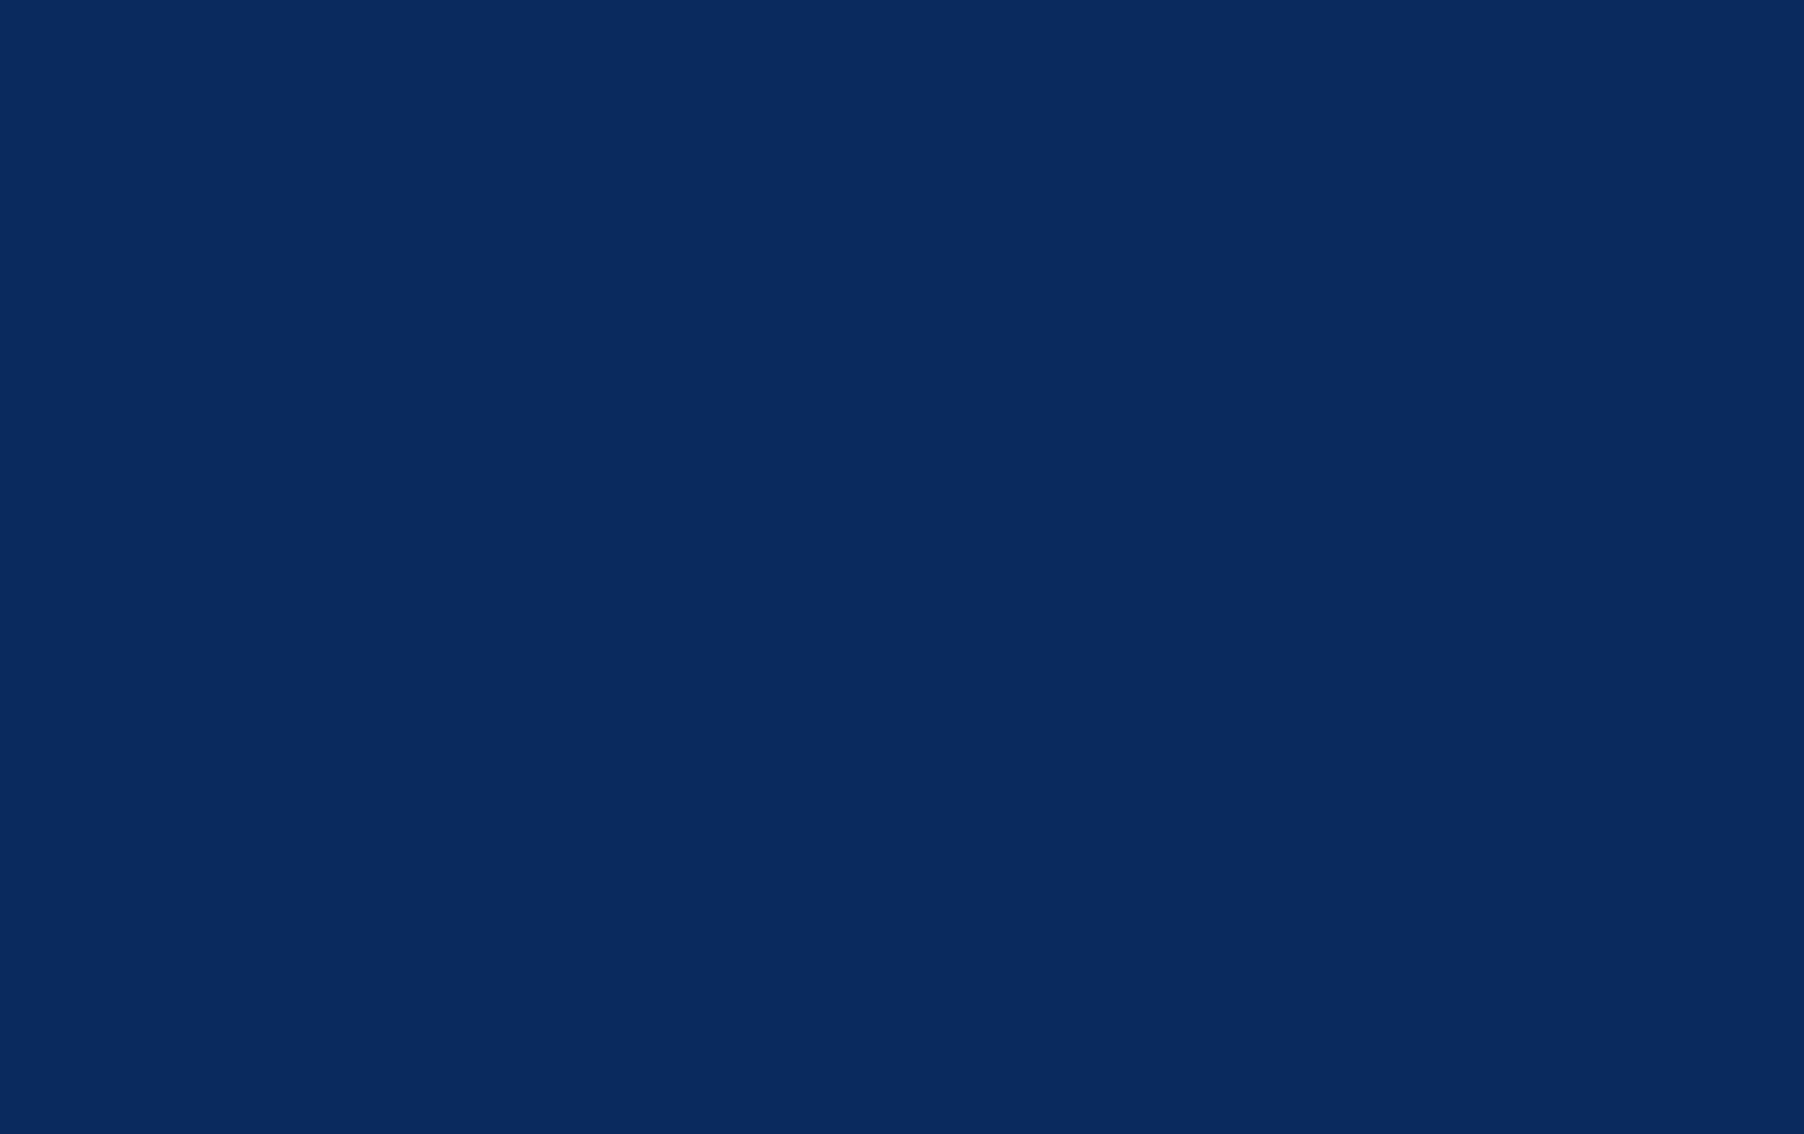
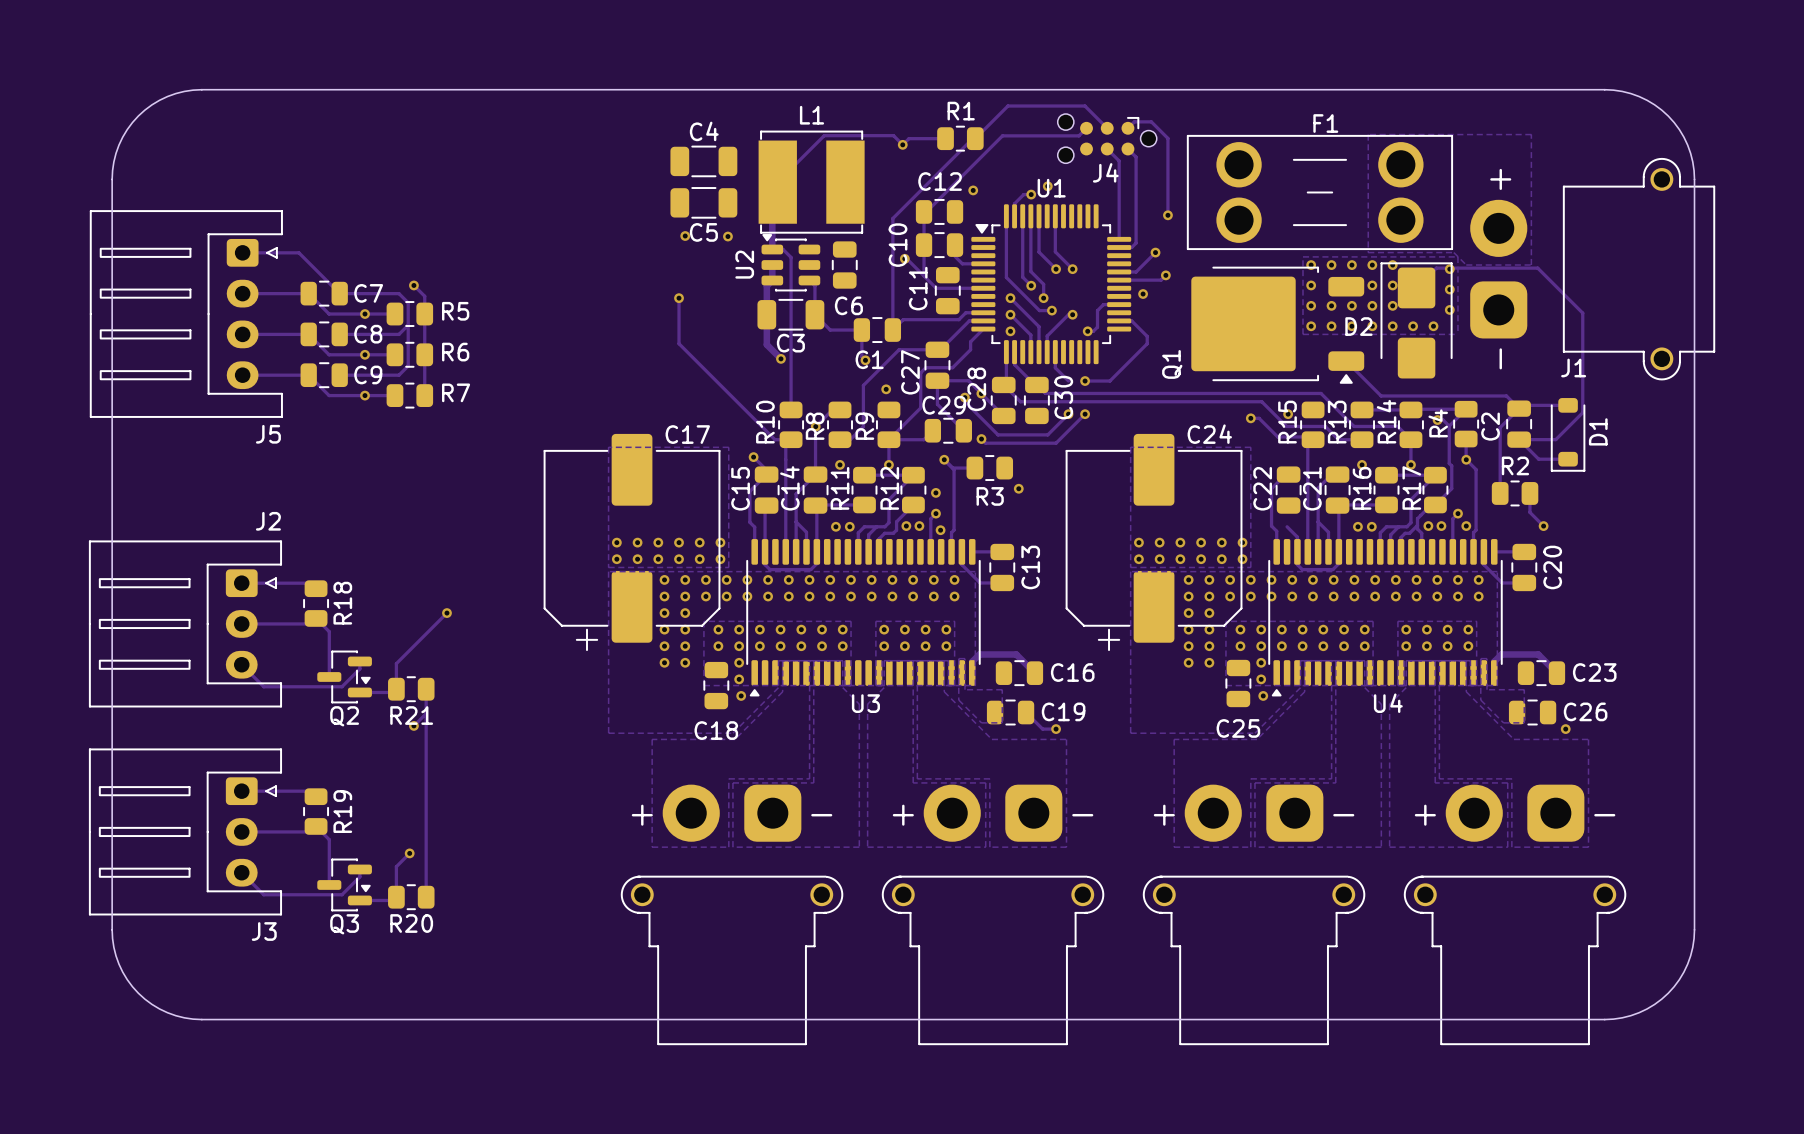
board edge: none -> (201, 89) (1604, 89) (1622, 91) (1647, 100) (1668, 115) (1683, 137) (1692, 161) (1694, 179) (1694, 929) (1692, 947) (1683, 972) (1668, 993) (1647, 1008) (1622, 1017) (1604, 1019) (201, 1019) (184, 1017) (159, 1008) (138, 993) (127, 979) (116, 955) (112, 938) (112, 179) (113, 161) (118, 145) (127, 129) (138, 115) (152, 104) (167, 96) (184, 91) (201, 89)
track: none -> (1086, 128) (1078, 135) (1002, 135) (926, 211) (924, 211) (924, 276)
track: none -> (1107, 128) (1084, 106) (1007, 106) (892, 218) (892, 330) (903, 319) (958, 319) (965, 312) (983, 312)
track: none -> (1127, 128) (1134, 121) (1151, 121) (1167, 138) (1167, 215)
zone outline: none -> (1368, 134) (1368, 252) (1453, 252) (1466, 265) (1531, 265) (1531, 134) (1368, 134)
track: none -> (945, 138) (908, 138) (902, 144) (893, 135) (824, 135) (777, 182)
R1: none -> (960, 138)
J4: none -> (1107, 138)
via: none -> (902, 144)
track: none -> (1107, 149) (1119, 160) (1119, 239)
track: none -> (1127, 149) (1136, 157) (1136, 243) (1131, 247) (1119, 247)
C4: none -> (703, 161)
L1: none -> (811, 182)
via: none -> (1047, 186)
track: none -> (772, 187) (772, 249) (783, 249) (791, 257) (791, 409)
via: none -> (973, 190)
F1: none -> (1319, 192)
track: none -> (1031, 194) (1023, 194) (1014, 203) (1014, 216)
via: none -> (1031, 194)
C5: none -> (703, 202)
C12: none -> (939, 211)
via: none -> (1167, 215)
track: none -> (1006, 216) (1006, 277) (1039, 310) (1051, 310)
track: none -> (1022, 216) (1022, 277) (1031, 285)
track: none -> (1030, 216) (1030, 271) (1043, 284) (1043, 298)
track: none -> (1039, 216) (1039, 252) (1056, 269)
track: none -> (1055, 216) (1055, 251) (1072, 269)
via: none -> (685, 236)
via: none -> (727, 236)
C10: none -> (939, 245)
track: none -> (242, 252) (298, 252) (339, 293) (399, 293) (408, 302) (408, 365) (399, 375) (339, 375)
track: none -> (1155, 252) (1136, 271) (1119, 271)
via: none -> (1155, 252)
track: none -> (955, 256) (962, 263) (983, 263)
zone outline: none -> (1302, 256) (1302, 334) (1457, 334) (1457, 256) (1302, 256)
track: none -> (904, 258) (936, 288) (983, 288)
via: none -> (904, 258)
U2: none -> (790, 262)
track: none -> (772, 265) (772, 280) (766, 286) (766, 344) (780, 358)
C6: none -> (844, 265)
via: none -> (1311, 265)
via: none -> (1331, 265)
via: none -> (1351, 265)
via: none -> (1372, 265)
via: none -> (1392, 265)
via: none -> (1056, 269)
via: none -> (1072, 269)
via: none -> (1449, 269)
J1: none -> (1592, 269)
track: none -> (1165, 275) (1161, 280) (1119, 280)
via: none -> (1165, 275)
track: none -> (809, 280) (814, 286) (814, 314) (830, 330) (861, 330) (861, 356) (865, 360)
U1: none -> (1051, 284)
track: none -> (413, 285) (424, 296) (424, 395)
via: none -> (413, 285)
via: none -> (1031, 285)
via: none -> (1311, 285)
via: none -> (1372, 285)
via: none -> (1392, 285)
track: none -> (1416, 287) (1436, 268) (1537, 268) (1582, 313) (1582, 412) (1555, 439) (1519, 439) (1538, 459) (1568, 459)
via: none -> (1449, 289)
C11: none -> (947, 290)
track: none -> (242, 293) (308, 293) (329, 314) (394, 314)
C7: none -> (324, 293)
via: none -> (1143, 294)
track: none -> (679, 298) (679, 343) (774, 439) (791, 439) (785, 445) (785, 551)
via: none -> (679, 298)
track: none -> (1010, 298) (1039, 326) (1039, 352)
via: none -> (1010, 298)
via: none -> (1043, 298)
track: none -> (1119, 304) (1103, 304) (1097, 310) (1097, 327) (1093, 331) (1087, 331)
via: none -> (1311, 305)
via: none -> (1331, 305)
via: none -> (1351, 305)
via: none -> (1372, 305)
via: none -> (1392, 305)
via: none -> (1449, 309)
via: none -> (1051, 310)
J5: none -> (186, 314)
via: none -> (364, 314)
R5: none -> (409, 314)
C3: none -> (790, 314)
track: none -> (1010, 314) (1030, 335) (1030, 352)
via: none -> (1010, 314)
track: none -> (1072, 314) (1068, 314) (1047, 336) (1047, 352)
via: none -> (1072, 314)
track: none -> (983, 320) (969, 320) (940, 349) (899, 349) (863, 385) (863, 426) (850, 439) (840, 439)
track: none -> (1119, 320) (1131, 320) (1147, 336) (1147, 343) (1109, 381) (1085, 381)
D2: none -> (1416, 320)
track: none -> (408, 325) (399, 334) (339, 334)
Q1: none -> (1277, 325)
via: none -> (1311, 326)
via: none -> (1331, 326)
via: none -> (1351, 326)
via: none -> (1372, 326)
via: none -> (1392, 326)
via: none -> (1413, 326)
via: none -> (1433, 326)
track: none -> (983, 329) (970, 341) (970, 349) (952, 367) (925, 367) (920, 372) (920, 407) (888, 439)
C1: none -> (877, 330)
via: none -> (1010, 331)
via: none -> (1087, 331)
track: none -> (242, 334) (308, 334) (329, 354) (394, 354)
C8: none -> (324, 334)
track: none -> (1006, 352) (1006, 382) (1003, 384) (1020, 401) (1261, 401) (1286, 426) (1325, 426) (1338, 439) (1362, 439)
track: none -> (1014, 352) (1014, 364) (1045, 393) (1321, 393) (1354, 426) (1397, 426) (1410, 439) (1410, 464)
track: none -> (1055, 352) (1055, 367) (1068, 381)
via: none -> (364, 354)
R6: none -> (409, 354)
via: none -> (780, 358)
via: none -> (865, 360)
track: none -> (1346, 361) (1381, 395) (1506, 395) (1519, 408)
C27: none -> (937, 365)
track: none -> (242, 375) (308, 375) (329, 395) (394, 395)
C9: none -> (324, 375)
via: none -> (1085, 381)
via: none -> (886, 389)
via: none -> (981, 393)
via: none -> (364, 395)
R7: none -> (409, 395)
track: none -> (964, 397) (964, 401) (998, 434) (1047, 434) (1068, 414)
via: none -> (964, 397)
C28: none -> (1003, 400)
C30: none -> (1036, 400)
track: none -> (1568, 405) (1526, 405) (1523, 408) (1519, 408)
track: none -> (1519, 408) (1500, 427) (1500, 493)
track: none -> (1362, 409) (1466, 409) (1449, 426)
track: none -> (840, 410) (832, 410) (815, 426) (815, 474) (796, 493) (796, 551)
via: none -> (1068, 414)
track: none -> (1085, 414) (1056, 443) (985, 443) (981, 439)
via: none -> (1085, 414)
via: none -> (1288, 414)
track: none -> (1004, 416) (968, 380) (937, 380) (937, 404) (963, 430)
track: none -> (1250, 418) (1259, 418) (1277, 436) (1310, 436) (1313, 439) (1307, 445) (1307, 551)
via: none -> (1250, 418)
track: none -> (1437, 420) (1443, 420) (1449, 426)
via: none -> (1437, 420)
R10: none -> (791, 424)
R8: none -> (840, 424)
R9: none -> (888, 424)
R15: none -> (1313, 424)
R13: none -> (1362, 424)
R14: none -> (1410, 424)
R4: none -> (1466, 424)
C2: none -> (1519, 424)
via: none -> (815, 426)
track: none -> (1449, 426) (1451, 488) (1435, 504) (1431, 504) (1417, 518) (1417, 529) (1421, 533) (1421, 551)
track: none -> (932, 430) (923, 439) (888, 439)
C29: none -> (948, 430)
D1: none -> (1568, 434)
track: none -> (888, 439) (888, 464)
via: none -> (981, 439)
track: none -> (1466, 439) (1466, 459) (1476, 469) (1476, 530) (1473, 532) (1473, 551)
zone outline: none -> (608, 447) (728, 447) (728, 567) (608, 567) (608, 447)
zone outline: none -> (1130, 447) (1250, 447) (1250, 567) (1130, 567) (1130, 447)
track: none -> (753, 457) (766, 470) (766, 474) (749, 491) (749, 522) (754, 527) (754, 551)
via: none -> (753, 457)
track: none -> (944, 459) (954, 469) (954, 530) (951, 532) (951, 551)
via: none -> (944, 459)
via: none -> (1466, 459)
via: none -> (840, 464)
via: none -> (888, 464)
via: none -> (1362, 464)
via: none -> (1410, 464)
track: none -> (952, 468) (974, 468)
R3: none -> (989, 468)
track: none -> (1288, 474) (1285, 474) (1271, 488) (1271, 526) (1276, 531) (1276, 551)
track: none -> (1337, 474) (1331, 474) (1317, 488) (1318, 551)
track: none -> (864, 475) (913, 475) (888, 499) (888, 522) (884, 526) (864, 526) (858, 532) (858, 551)
track: none -> (1386, 475) (1435, 475) (1410, 499) (1410, 522) (1406, 526) (1386, 526) (1380, 532) (1380, 551)
via: none -> (1018, 488)
C15: none -> (766, 490)
C14: none -> (815, 490)
R11: none -> (864, 490)
R12: none -> (913, 490)
C22: none -> (1288, 490)
C21: none -> (1337, 490)
R16: none -> (1386, 490)
R17: none -> (1435, 490)
via: none -> (935, 492)
R2: none -> (1515, 493)
track: none -> (1529, 493) (1529, 512) (1543, 526)
track: none -> (864, 504) (815, 505) (816, 563) (810, 569) (769, 569) (765, 564) (765, 507) (766, 505) (764, 505)
track: none -> (913, 504) (896, 521) (896, 530) (893, 533) (884, 533) (879, 539) (879, 551)
track: none -> (1386, 504) (1337, 505) (1338, 563) (1332, 569) (1302, 569) (1297, 564) (1297, 537) (1287, 526)
track: none -> (935, 513) (930, 518) (930, 551)
via: none -> (935, 513)
track: none -> (1457, 513) (1452, 518) (1452, 551)
via: none -> (1457, 513)
track: none -> (796, 521) (806, 532) (806, 551)
track: none -> (1318, 521) (1328, 532) (1328, 551)
track: none -> (1417, 525) (1409, 533) (1405, 533) (1401, 537) (1401, 551)
via: none -> (835, 526)
via: none -> (849, 526)
track: none -> (876, 526) (868, 534) (868, 551)
via: none -> (906, 526)
via: none -> (919, 526)
via: none -> (1357, 526)
via: none -> (1371, 526)
track: none -> (1398, 526) (1390, 534) (1390, 551)
via: none -> (1428, 526)
via: none -> (1441, 526)
via: none -> (1466, 526)
via: none -> (1543, 526)
via: none -> (940, 530)
via: none -> (616, 542)
C17: none -> (632, 542)
via: none -> (637, 542)
via: none -> (658, 542)
via: none -> (679, 542)
via: none -> (699, 542)
via: none -> (720, 542)
via: none -> (1138, 542)
C24: none -> (1154, 542)
via: none -> (1159, 542)
via: none -> (1180, 542)
via: none -> (1201, 542)
via: none -> (1221, 542)
via: none -> (1242, 542)
track: none -> (961, 551) (961, 564) (980, 582) (1002, 582)
track: none -> (972, 551) (1002, 551)
track: none -> (1483, 551) (1483, 564) (1502, 582) (1524, 582)
track: none -> (1494, 551) (1524, 551)
via: none -> (616, 559)
via: none -> (637, 559)
via: none -> (658, 559)
via: none -> (679, 559)
via: none -> (699, 559)
via: none -> (720, 559)
via: none -> (1138, 559)
via: none -> (1159, 559)
via: none -> (1180, 559)
via: none -> (1201, 559)
via: none -> (1221, 559)
via: none -> (1242, 559)
C13: none -> (1002, 567)
C20: none -> (1524, 567)
zone outline: none -> (608, 571) (975, 571) (975, 685) (780, 685) (732, 733) (608, 733) (608, 571)
zone outline: none -> (1130, 571) (1130, 733) (1254, 733) (1302, 685) (1497, 685) (1497, 571) (1130, 571)
via: none -> (664, 579)
via: none -> (685, 579)
via: none -> (705, 579)
via: none -> (726, 579)
via: none -> (747, 579)
via: none -> (768, 579)
via: none -> (788, 579)
via: none -> (809, 579)
via: none -> (830, 579)
via: none -> (850, 579)
via: none -> (871, 579)
via: none -> (892, 579)
via: none -> (913, 579)
via: none -> (933, 579)
via: none -> (954, 579)
via: none -> (1188, 579)
via: none -> (1209, 579)
via: none -> (1230, 579)
via: none -> (1250, 579)
via: none -> (1271, 579)
via: none -> (1292, 579)
via: none -> (1312, 579)
via: none -> (1333, 579)
via: none -> (1354, 579)
via: none -> (1375, 579)
via: none -> (1395, 579)
via: none -> (1416, 579)
via: none -> (1437, 579)
via: none -> (1457, 579)
via: none -> (1478, 579)
track: none -> (241, 583) (310, 583) (316, 588)
via: none -> (664, 596)
via: none -> (685, 596)
via: none -> (705, 596)
via: none -> (726, 596)
via: none -> (747, 596)
via: none -> (768, 596)
via: none -> (788, 596)
via: none -> (809, 596)
via: none -> (830, 596)
via: none -> (850, 596)
via: none -> (871, 596)
via: none -> (892, 596)
via: none -> (913, 596)
via: none -> (933, 596)
via: none -> (954, 596)
via: none -> (1188, 596)
via: none -> (1209, 596)
via: none -> (1230, 596)
via: none -> (1250, 596)
via: none -> (1271, 596)
via: none -> (1292, 596)
via: none -> (1312, 596)
via: none -> (1333, 596)
via: none -> (1354, 596)
via: none -> (1375, 596)
via: none -> (1395, 596)
via: none -> (1416, 596)
via: none -> (1437, 596)
via: none -> (1457, 596)
via: none -> (1478, 596)
R18: none -> (316, 603)
track: none -> (446, 613) (396, 663) (396, 689) (393, 692)
via: none -> (446, 613)
via: none -> (664, 613)
via: none -> (685, 613)
via: none -> (1188, 613)
via: none -> (1209, 613)
U3: none -> (863, 617)
U4: none -> (1385, 617)
J2: none -> (185, 623)
track: none -> (241, 623) (310, 623) (316, 618) (329, 631) (329, 676)
via: none -> (664, 629)
via: none -> (685, 629)
via: none -> (718, 629)
via: none -> (739, 629)
via: none -> (759, 629)
via: none -> (780, 629)
via: none -> (801, 629)
via: none -> (822, 629)
via: none -> (842, 629)
via: none -> (884, 629)
via: none -> (904, 629)
via: none -> (925, 629)
via: none -> (946, 629)
via: none -> (1188, 629)
via: none -> (1209, 629)
via: none -> (1240, 629)
via: none -> (1261, 629)
via: none -> (1281, 629)
via: none -> (1302, 629)
via: none -> (1323, 629)
via: none -> (1344, 629)
via: none -> (1364, 629)
via: none -> (1406, 629)
via: none -> (1426, 629)
via: none -> (1447, 629)
via: none -> (1468, 629)
via: none -> (664, 646)
via: none -> (685, 646)
via: none -> (718, 646)
via: none -> (739, 646)
via: none -> (759, 646)
via: none -> (780, 646)
via: none -> (801, 646)
via: none -> (822, 646)
via: none -> (842, 646)
via: none -> (884, 646)
via: none -> (904, 646)
via: none -> (925, 646)
via: none -> (946, 646)
via: none -> (1188, 646)
via: none -> (1209, 646)
via: none -> (1240, 646)
via: none -> (1261, 646)
via: none -> (1281, 646)
via: none -> (1302, 646)
via: none -> (1323, 646)
via: none -> (1344, 646)
via: none -> (1364, 646)
via: none -> (1406, 646)
via: none -> (1426, 646)
via: none -> (1447, 646)
via: none -> (1468, 646)
zone outline: none -> (958, 658) (964, 658) (964, 689) (1002, 689) (1002, 722) (981, 722) (958, 700) (958, 658)
zone outline: none -> (1480, 658) (1480, 700) (1503, 722) (1524, 722) (1524, 689) (1487, 689) (1487, 658) (1480, 658)
zone outline: none -> (782, 660) (782, 691) (735, 739) (652, 739) (652, 847) (728, 847) (728, 778) (809, 778) (809, 660)
zone outline: none -> (813, 660) (813, 782) (732, 782) (732, 847) (859, 847) (859, 704) (842, 687) (842, 660)
zone outline: none -> (884, 660) (884, 687) (867, 704) (867, 847) (985, 847) (985, 782) (913, 782) (913, 660)
zone outline: none -> (917, 660) (917, 778) (989, 778) (989, 847) (1066, 847) (1066, 739) (991, 739) (944, 691) (944, 660)
zone outline: none -> (1304, 660) (1304, 691) (1257, 739) (1174, 739) (1174, 847) (1250, 847) (1250, 778) (1331, 778) (1331, 660)
zone outline: none -> (1335, 660) (1335, 782) (1254, 782) (1254, 847) (1381, 847) (1381, 704) (1364, 687) (1364, 660)
zone outline: none -> (1406, 660) (1406, 687) (1389, 704) (1389, 847) (1507, 847) (1507, 782) (1435, 782) (1435, 660)
zone outline: none -> (1439, 660) (1439, 778) (1511, 778) (1511, 847) (1588, 847) (1588, 739) (1513, 739) (1466, 691) (1466, 660)
track: none -> (359, 661) (359, 668) (342, 686) (263, 686) (241, 664)
via: none -> (664, 662)
via: none -> (685, 662)
via: none -> (739, 662)
via: none -> (1188, 662)
via: none -> (1209, 662)
via: none -> (1261, 662)
track: none -> (972, 672) (972, 661) (979, 654) (1016, 654) (1034, 673)
track: none -> (1494, 672) (1494, 661) (1501, 654) (1538, 654) (1556, 673)
C16: none -> (1019, 673)
C23: none -> (1541, 673)
Q2: none -> (344, 676)
via: none -> (739, 679)
via: none -> (1261, 679)
C25: none -> (1238, 683)
C18: none -> (716, 685)
zone outline: none -> (844, 685) (844, 660) (778, 660) (778, 685) (703, 685) (703, 621) (851, 621) (851, 685)
zone outline: none -> (875, 685) (875, 621) (954, 621) (954, 685)
zone outline: none -> (882, 685) (882, 660) (948, 660) (948, 685)
zone outline: none -> (1366, 685) (1366, 660) (1300, 660) (1300, 685) (1225, 685) (1225, 621) (1373, 621) (1373, 685)
zone outline: none -> (1397, 685) (1397, 621) (1476, 621) (1476, 685)
zone outline: none -> (1404, 685) (1404, 660) (1470, 660) (1470, 685)
R21: none -> (411, 689)
track: none -> (426, 689) (426, 897)
track: none -> (359, 692) (387, 692)
via: none -> (741, 695)
via: none -> (1263, 695)
C19: none -> (1010, 712)
track: none -> (1026, 712) (1042, 729) (1056, 729)
C26: none -> (1532, 712)
track: none -> (426, 713) (413, 725)
via: none -> (413, 725)
via: none -> (1056, 729)
via: none -> (1565, 729)
track: none -> (241, 791) (310, 791) (316, 796)
R19: none -> (316, 811)
J3: none -> (185, 831)
track: none -> (241, 831) (310, 831) (316, 826) (329, 839) (329, 884)
track: none -> (409, 853) (396, 866) (396, 897) (393, 900)
via: none -> (409, 853)
track: none -> (359, 869) (359, 876) (342, 894) (263, 894) (241, 872)
Q3: none -> (344, 884)
R20: none -> (411, 897)
track: none -> (359, 900) (387, 900)
part: none -> (732, 914)
part: none -> (993, 914)
part: none -> (1254, 914)
part: none -> (1515, 914)

